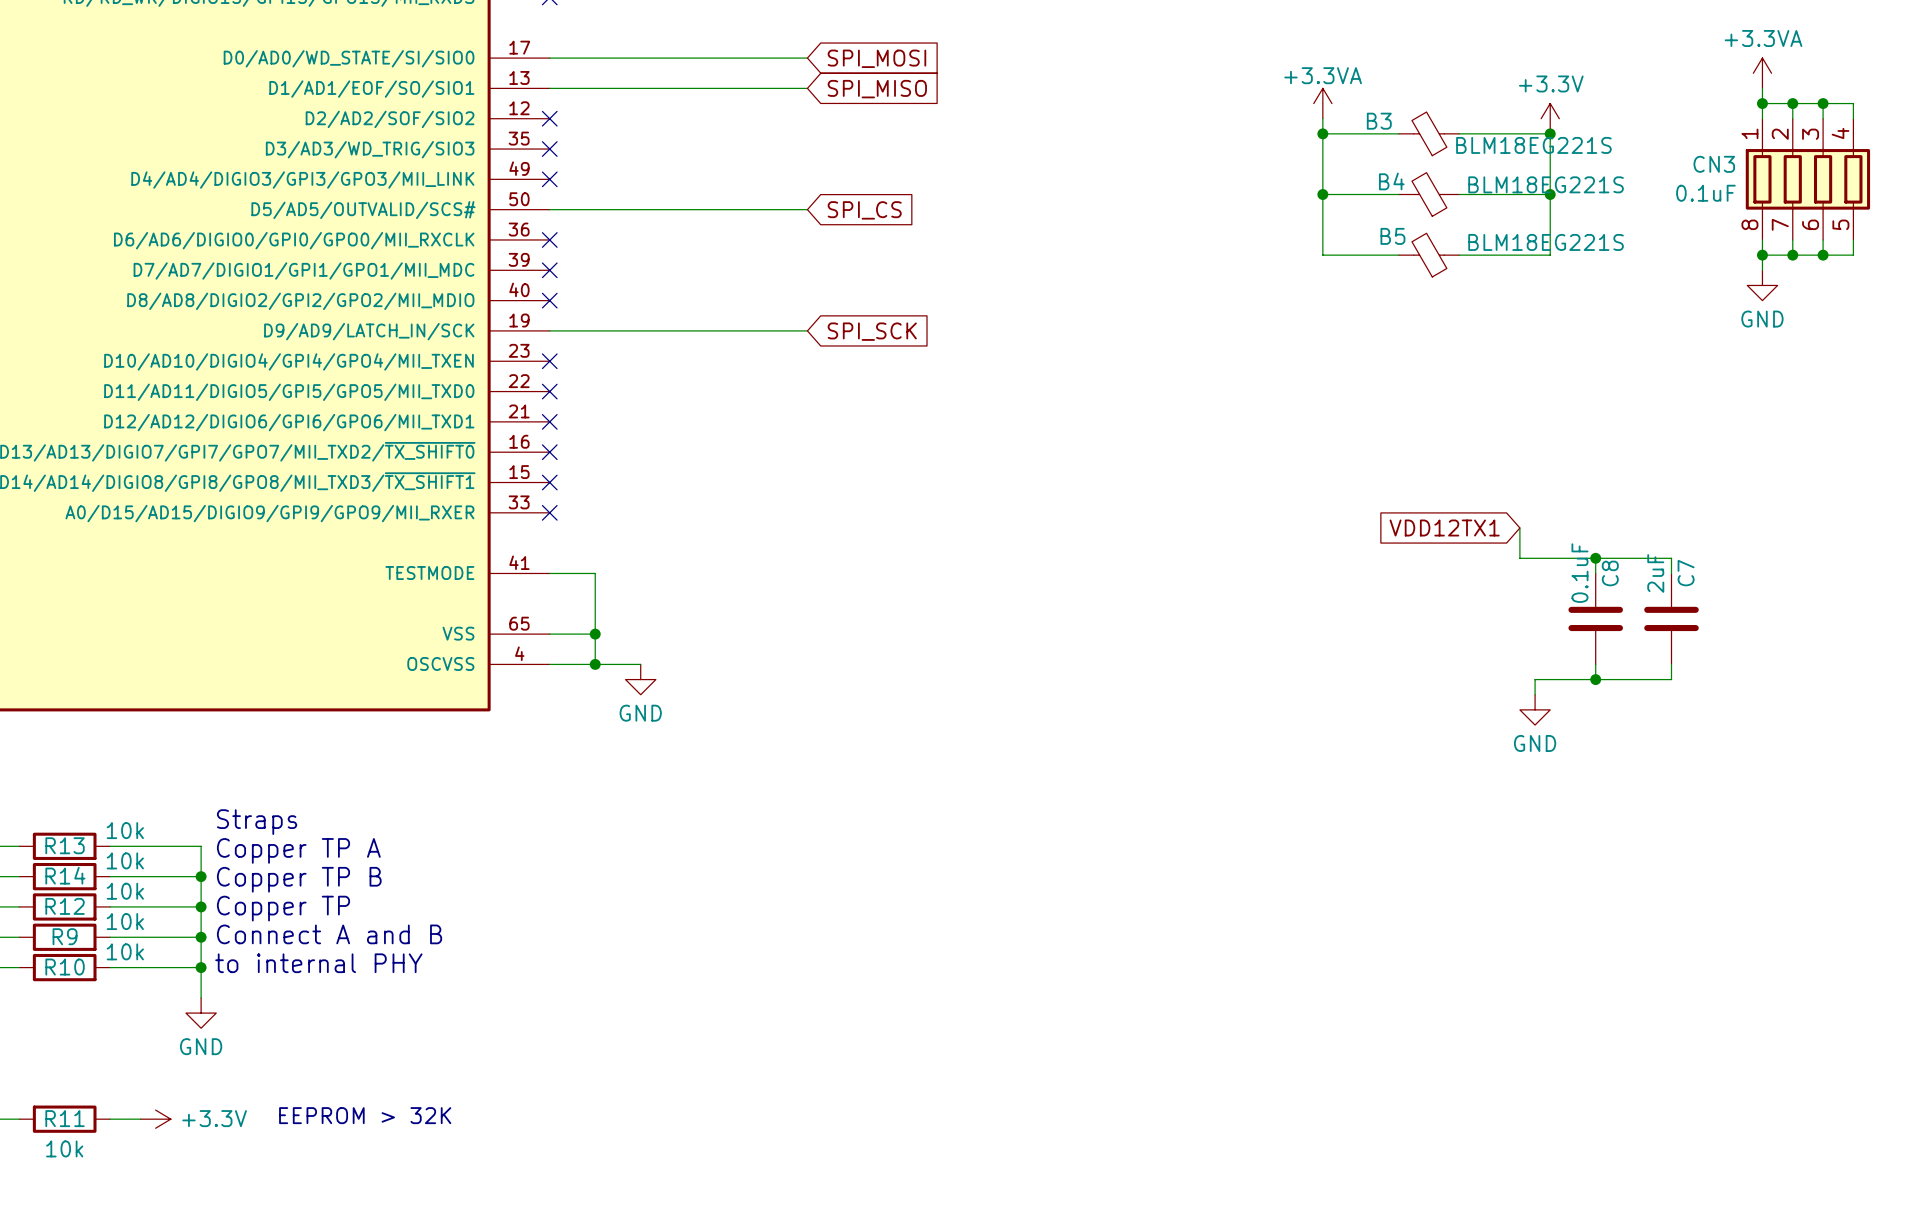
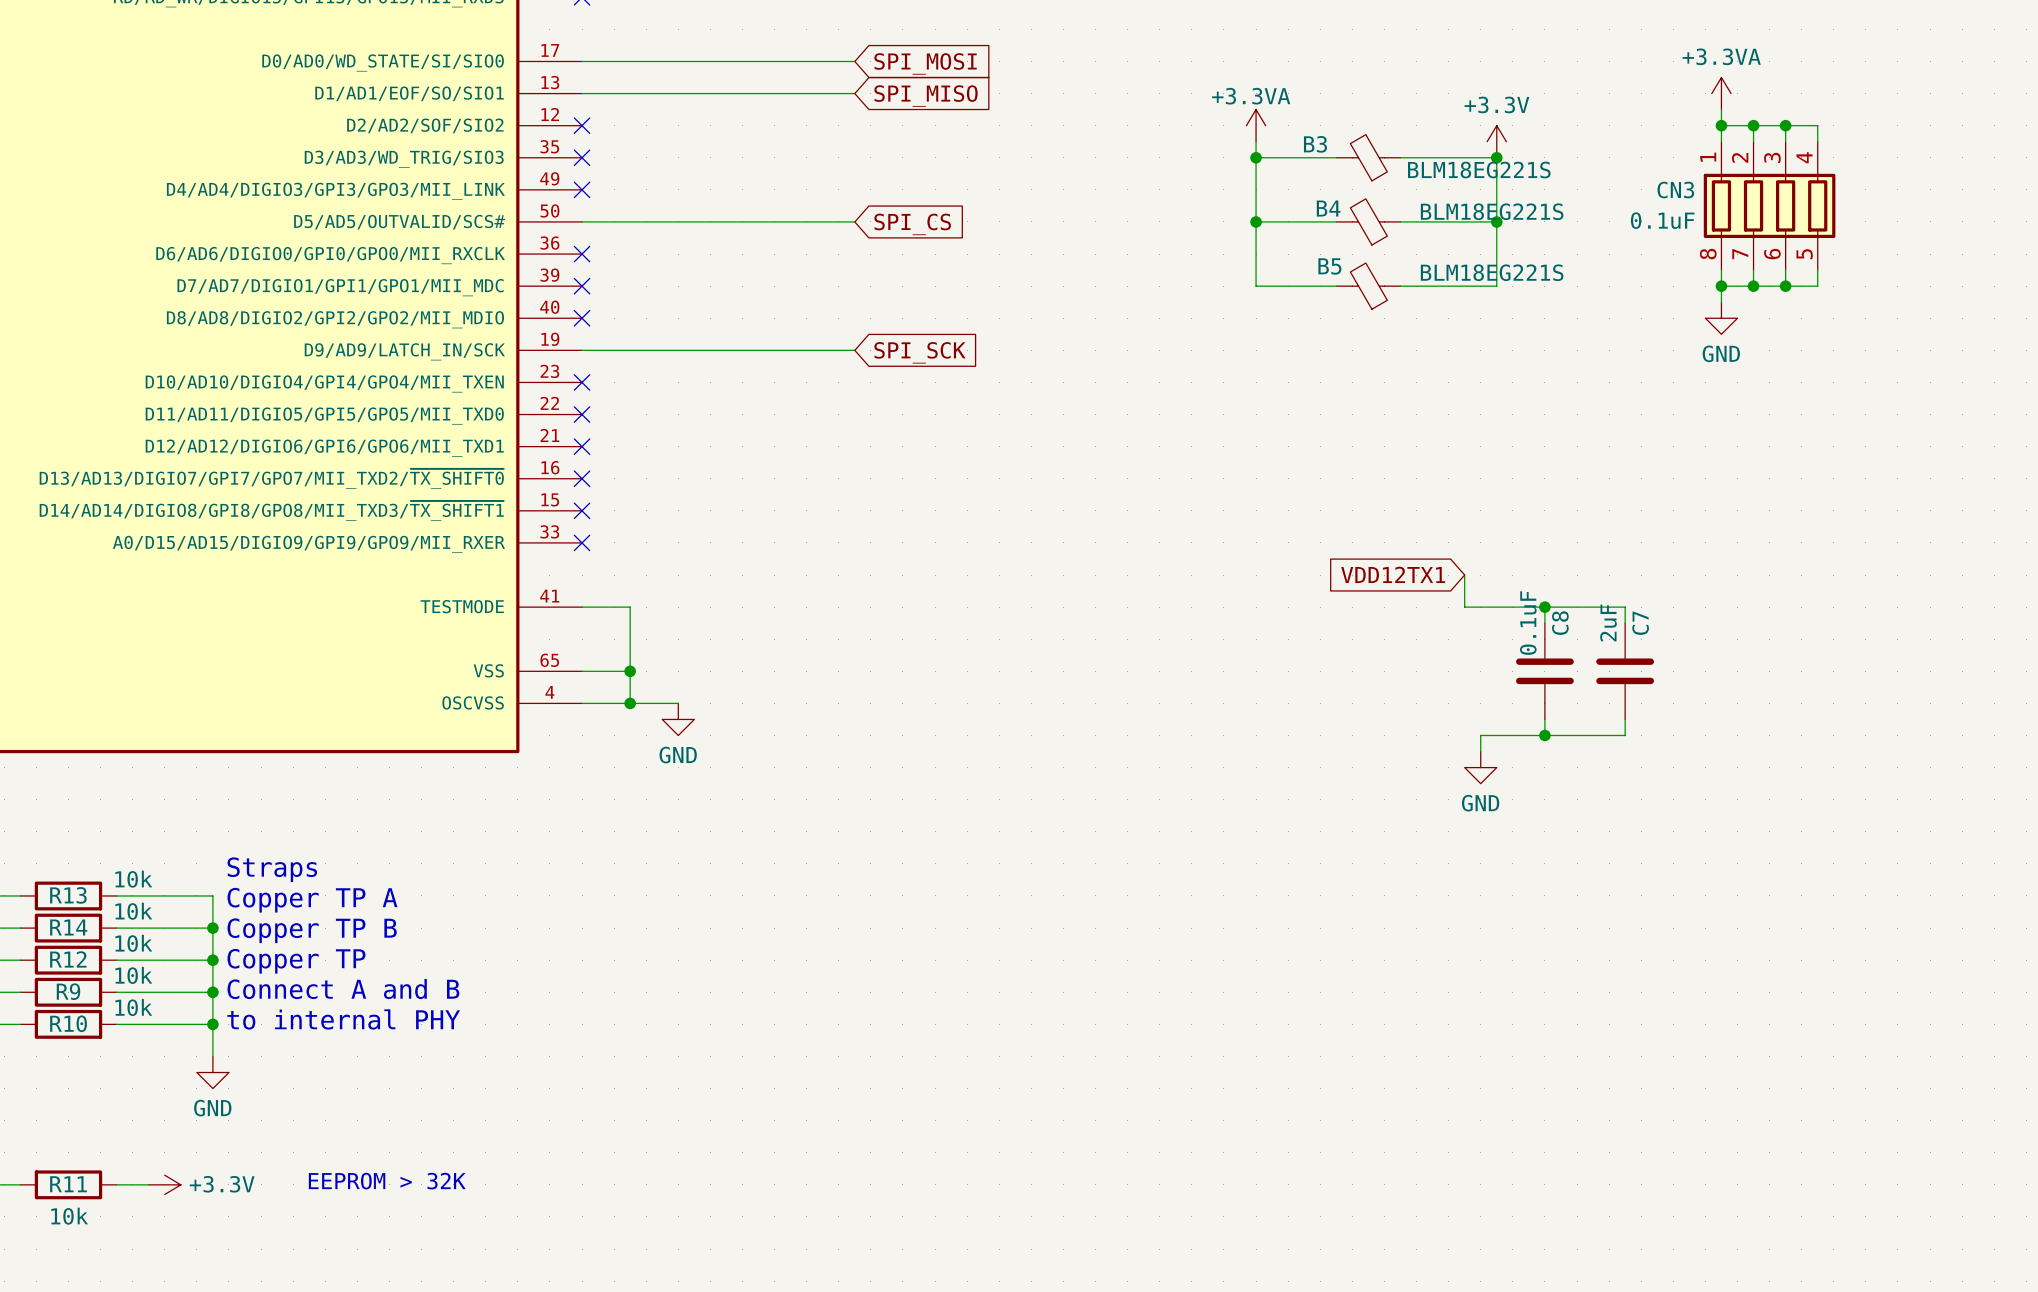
power symbol position: +3.3VA (1762, 73) -> +3.3VA (1721, 93)
wire: (1762, 88) (1762, 118) -> (1721, 109) (1721, 141)
power symbol position: +3.3VA (1322, 103) -> +3.3VA (1256, 125)
wire: (1762, 103) (1853, 103) (1853, 118) -> (1721, 125) (1817, 125) (1817, 141)
junction: (1762, 103) -> none
wire: (1792, 103) (1792, 118) -> (1753, 125) (1753, 141)
junction: (1792, 103) -> none
wire: (1823, 103) (1823, 118) -> (1785, 125) (1785, 141)
junction: (1823, 103) -> none
wire: (1322, 118) (1322, 255) (1398, 255) -> (1256, 141) (1256, 286) (1336, 286)
power symbol position: +3.3V (1550, 118) -> +3.3V (1496, 141)
junction: none -> (1721, 125)
junction: none -> (1753, 125)
junction: none -> (1785, 125)
wire: (1322, 133) (1398, 133) -> (1256, 157) (1336, 157)
junction: (1322, 133) -> none
B3 position: (1428, 133) -> (1368, 157)
wire: (1459, 133) (1550, 133) (1550, 255) (1459, 255) -> (1400, 157) (1496, 157) (1496, 286) (1400, 286)
junction: (1550, 133) -> none
junction: none -> (1256, 157)
junction: none -> (1496, 157)
CN3 position: (1807, 179) -> (1769, 205)
wire: (1322, 194) (1398, 194) -> (1256, 221) (1336, 221)
junction: (1322, 194) -> none
B4 position: (1428, 194) -> (1368, 221)
wire: (1459, 194) (1550, 194) -> (1400, 221) (1496, 221)
junction: (1550, 194) -> none
junction: none -> (1256, 221)
junction: none -> (1496, 221)
wire: (1762, 239) (1762, 270) -> (1721, 270) (1721, 302)
wire: (1792, 239) (1792, 255) -> (1753, 270) (1753, 286)
wire: (1823, 239) (1823, 255) -> (1785, 270) (1785, 286)
wire: (1853, 239) (1853, 255) (1762, 255) -> (1817, 270) (1817, 286) (1721, 286)
B5 position: (1428, 255) -> (1368, 286)
junction: (1762, 255) -> none
junction: (1792, 255) -> none
junction: (1823, 255) -> none
junction: none -> (1721, 286)
junction: none -> (1753, 286)
junction: none -> (1785, 286)
power symbol position: GND (1762, 285) -> GND (1721, 318)
global label position: VDD12TX1 (1444, 527) -> VDD12TX1 (1393, 574)
wire: (1519, 527) (1519, 558) (1671, 558) (1671, 573) -> (1464, 575) (1464, 607) (1625, 607) (1625, 623)
wire: (1595, 558) (1595, 573) -> (1544, 607) (1544, 623)
junction: (1595, 558) -> none
junction: none -> (1544, 607)
C8 position: (1595, 618) -> (1544, 671)
C7 position: (1671, 618) -> (1625, 671)
wire: (1595, 664) (1595, 679) -> (1544, 719) (1544, 735)
wire: (1671, 664) (1671, 679) (1535, 679) -> none
junction: (1595, 679) -> none
junction: none -> (1544, 735)
wire: none -> (1625, 735) (1480, 735) (1480, 751)
power symbol position: GND (1535, 709) -> GND (1480, 767)

